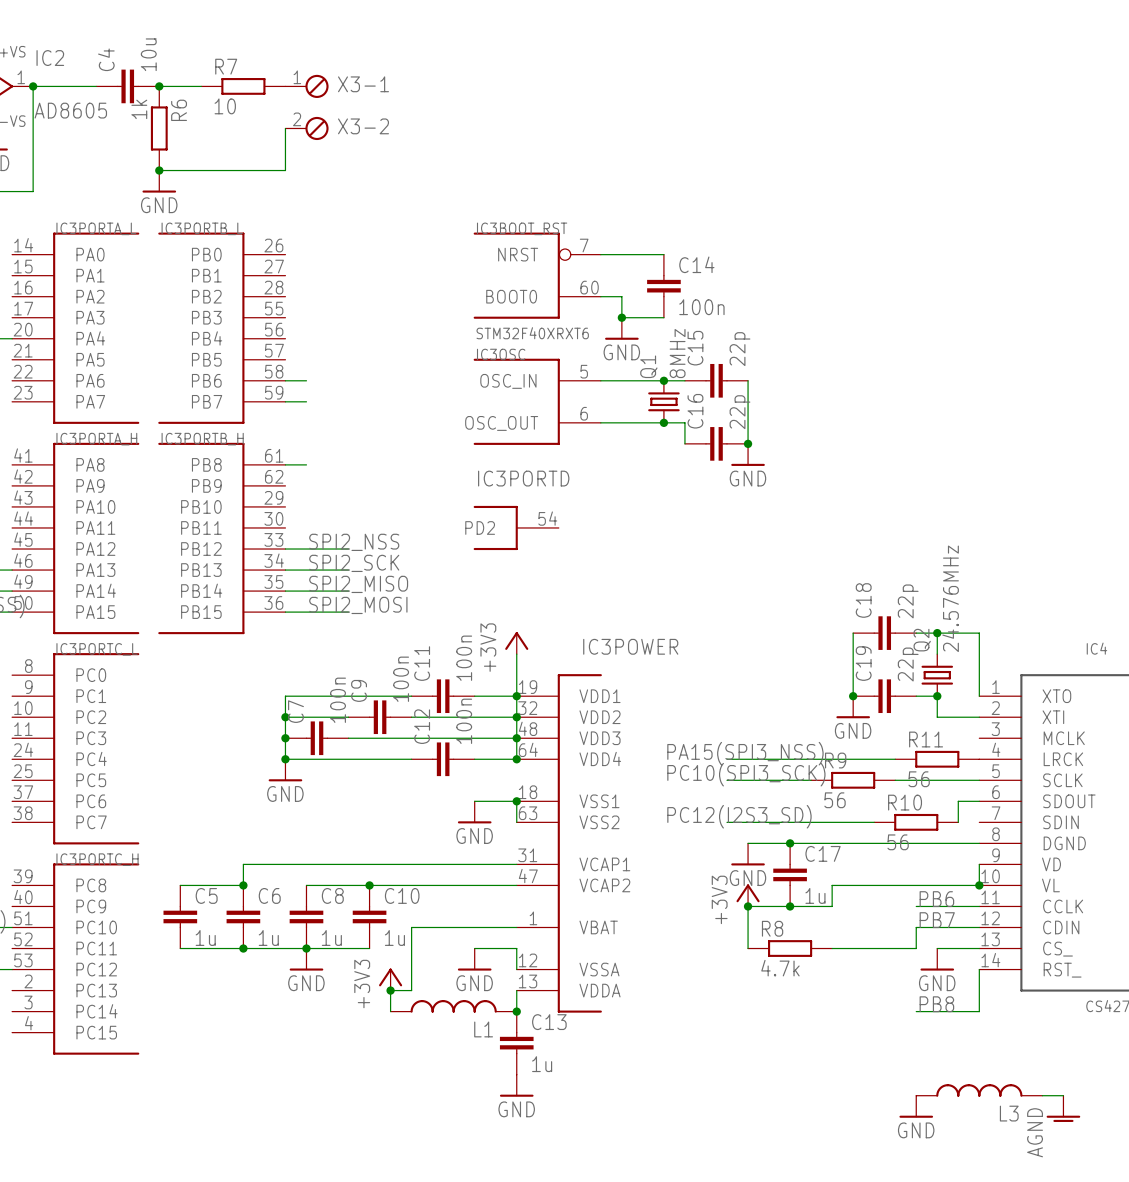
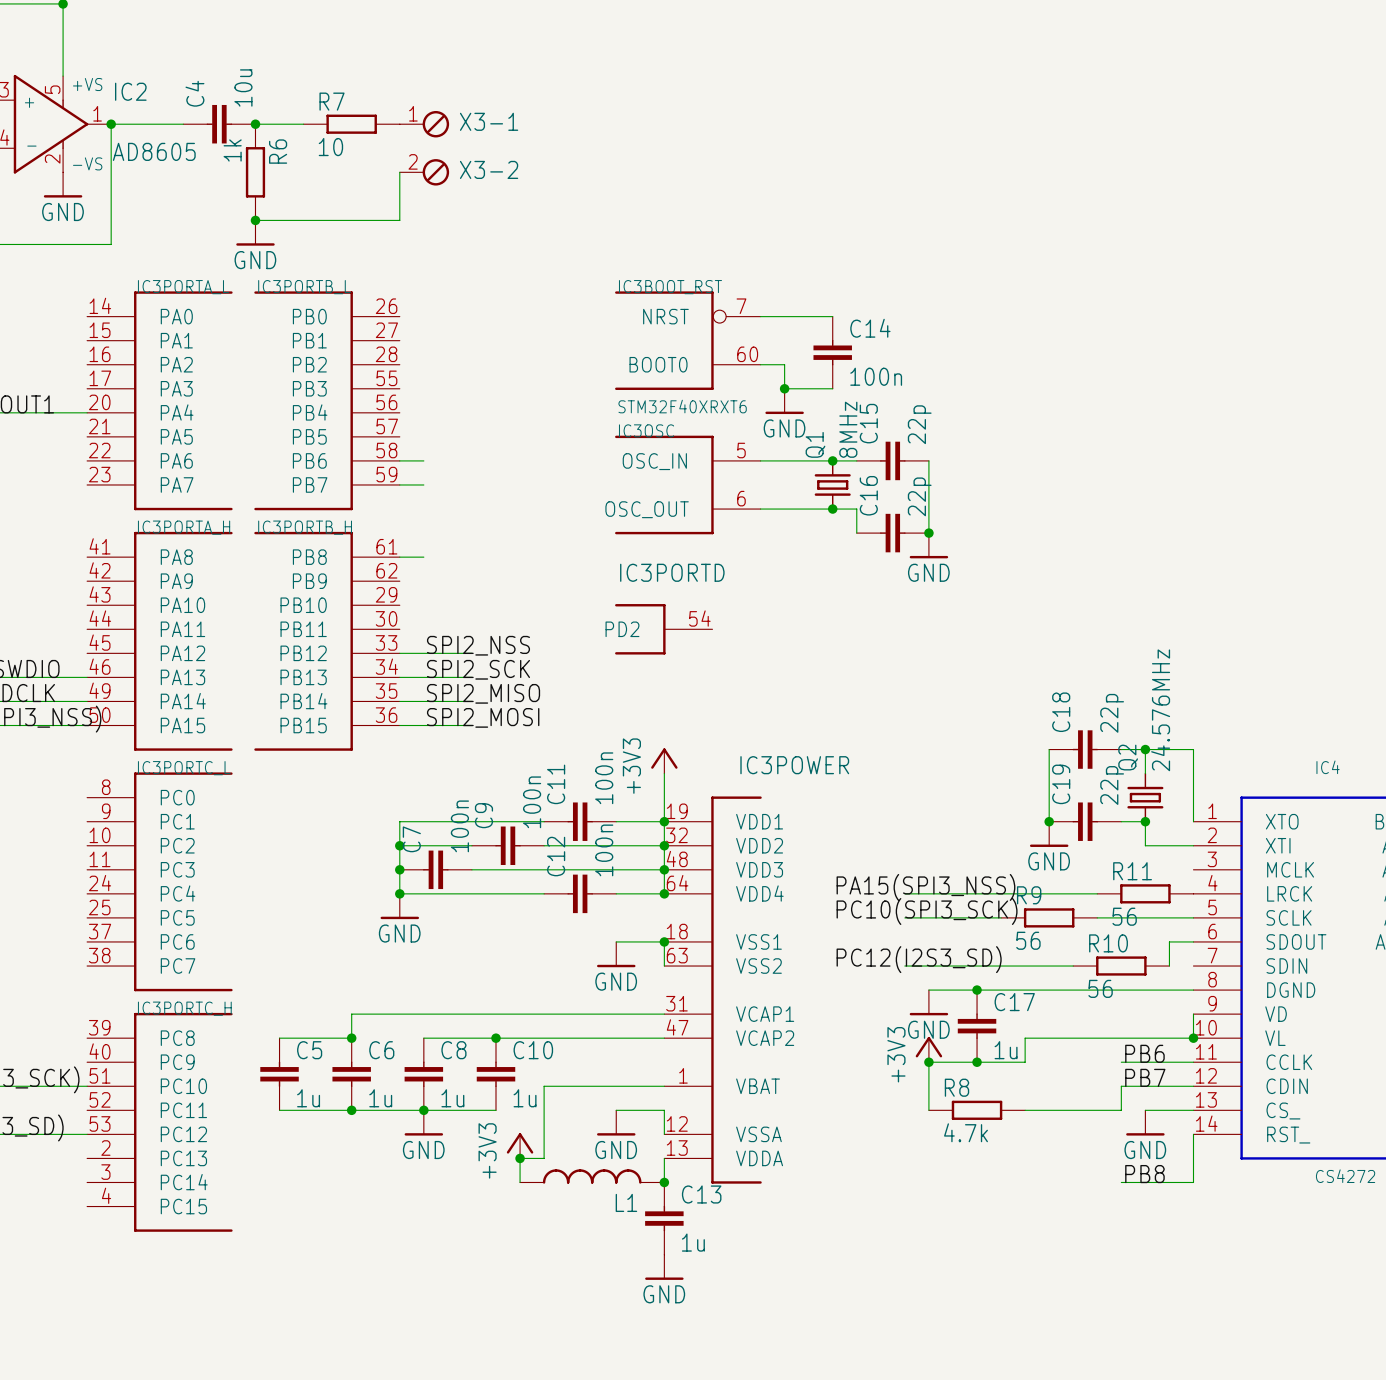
L3: (979, 1090) -> none
wire: (1042, 1095) (1063, 1095) -> none
power symbol: GND (916, 1106) -> none
power symbol: AGND (1063, 1108) -> none

